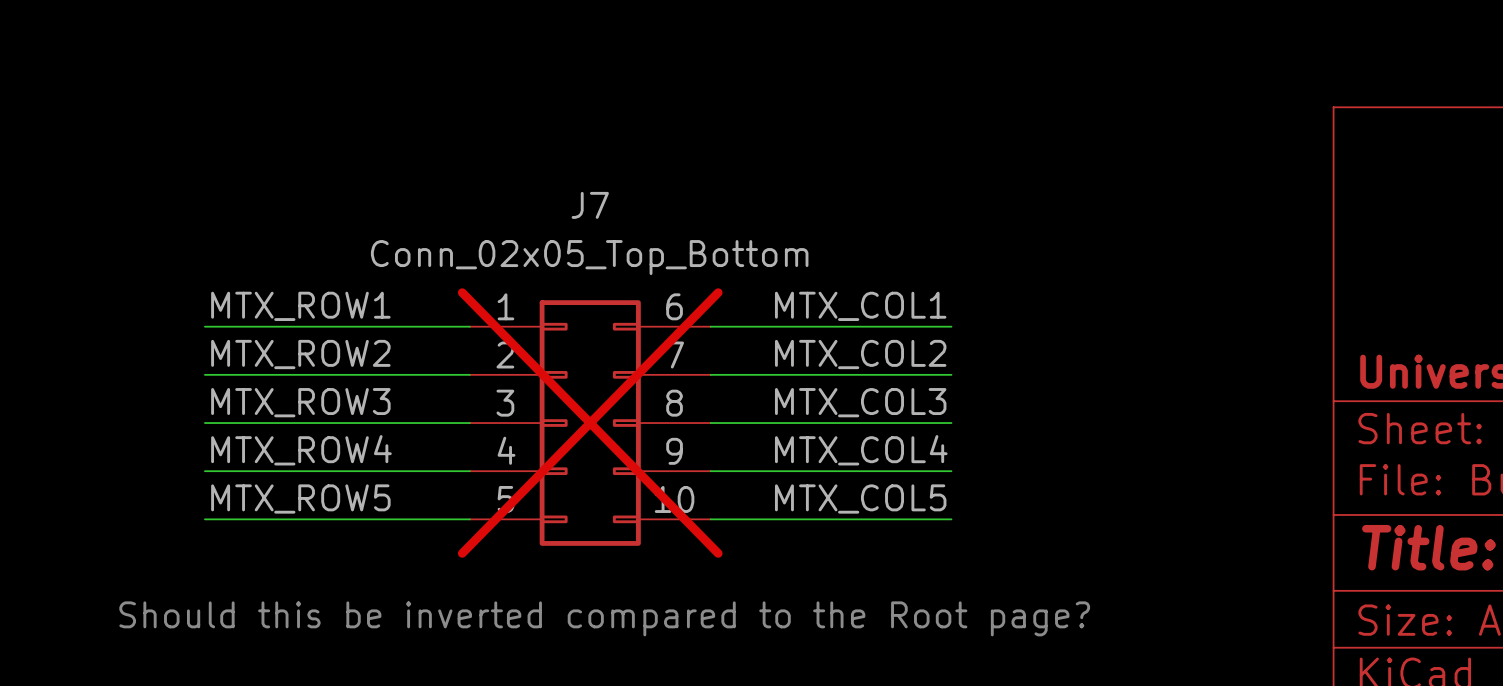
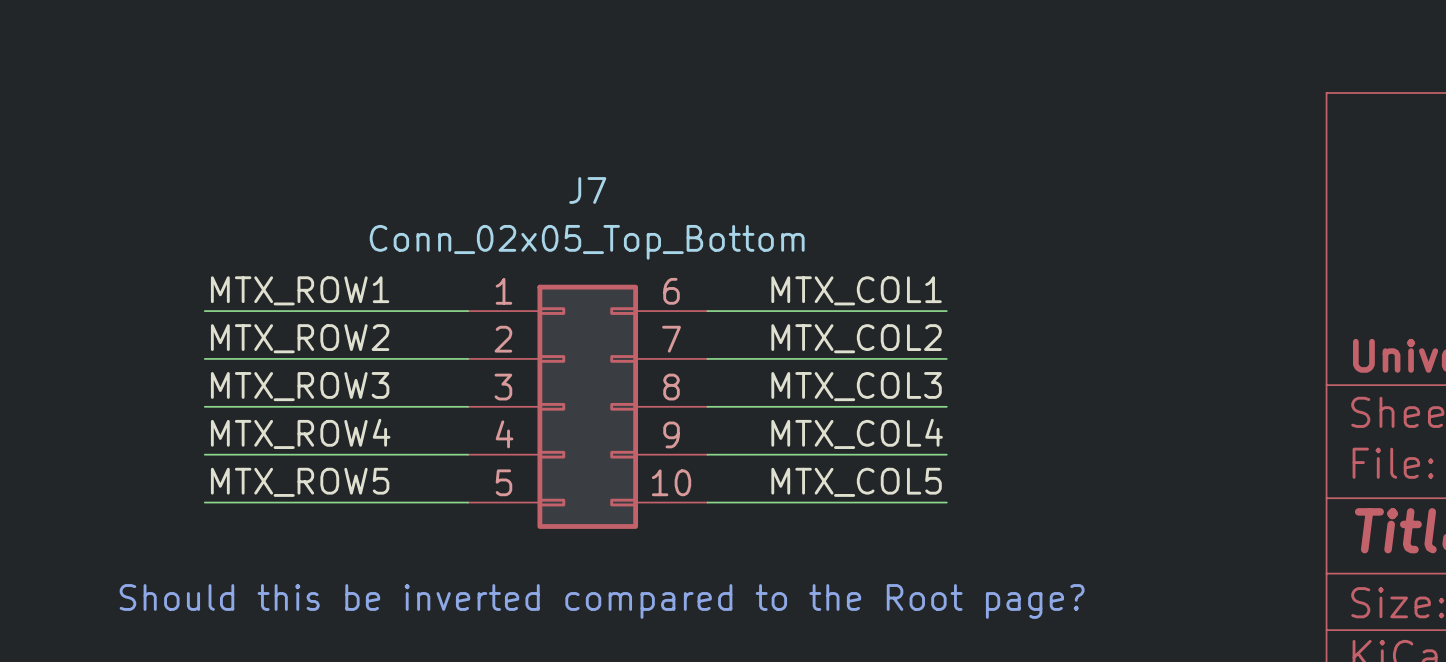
J7 do-not-place cross: (590, 423) -> none

